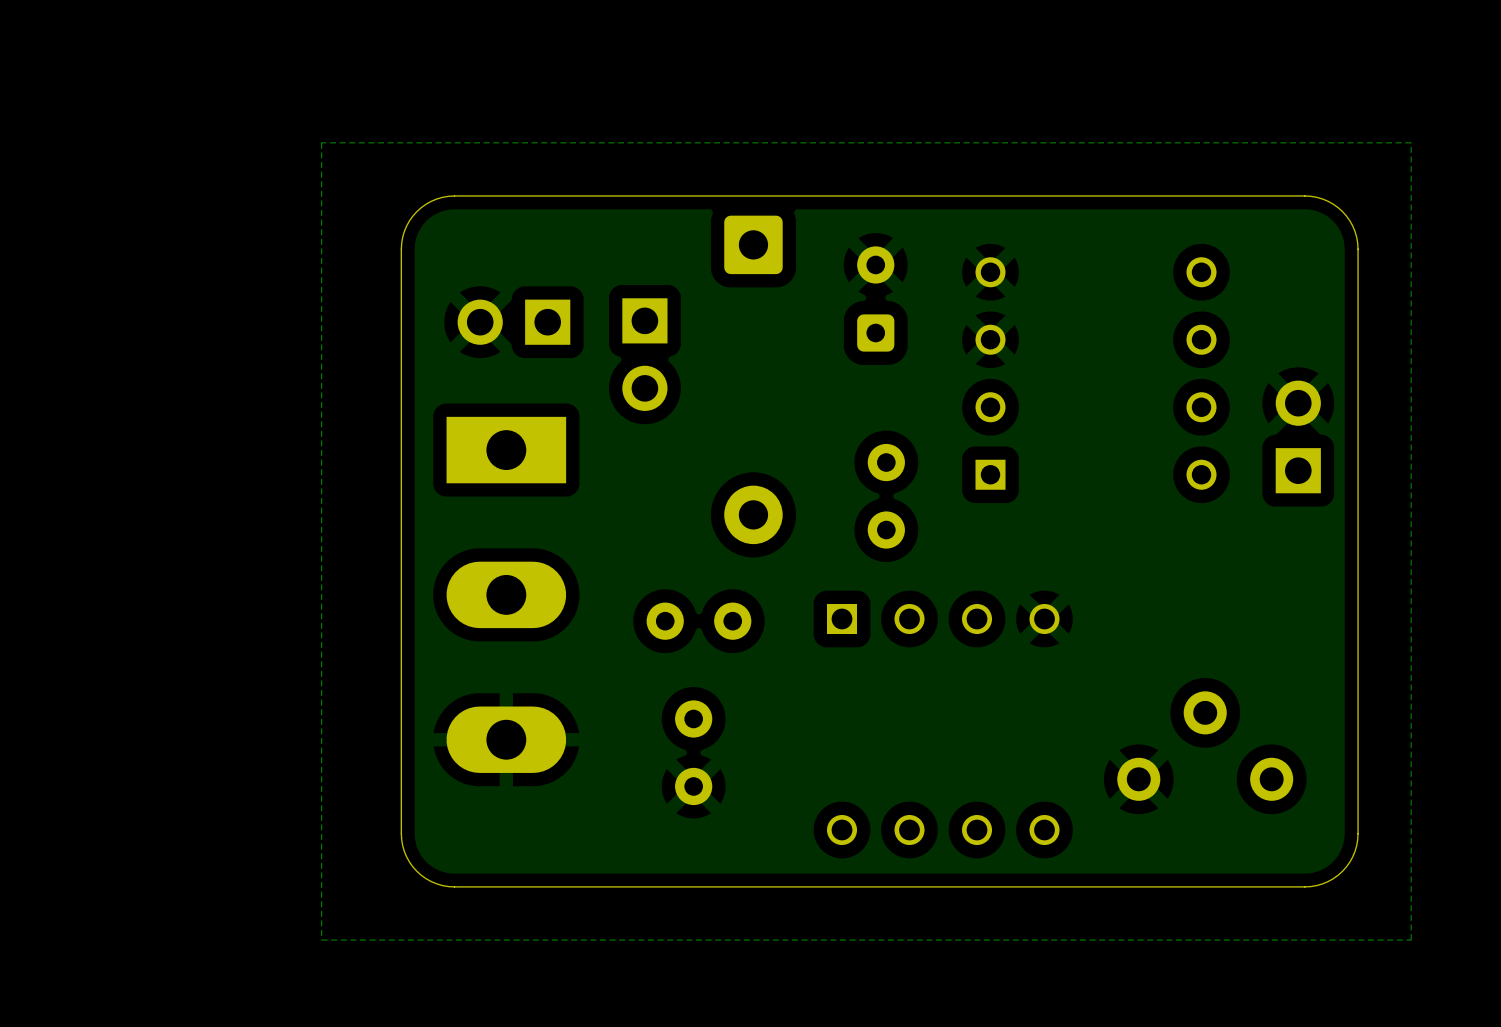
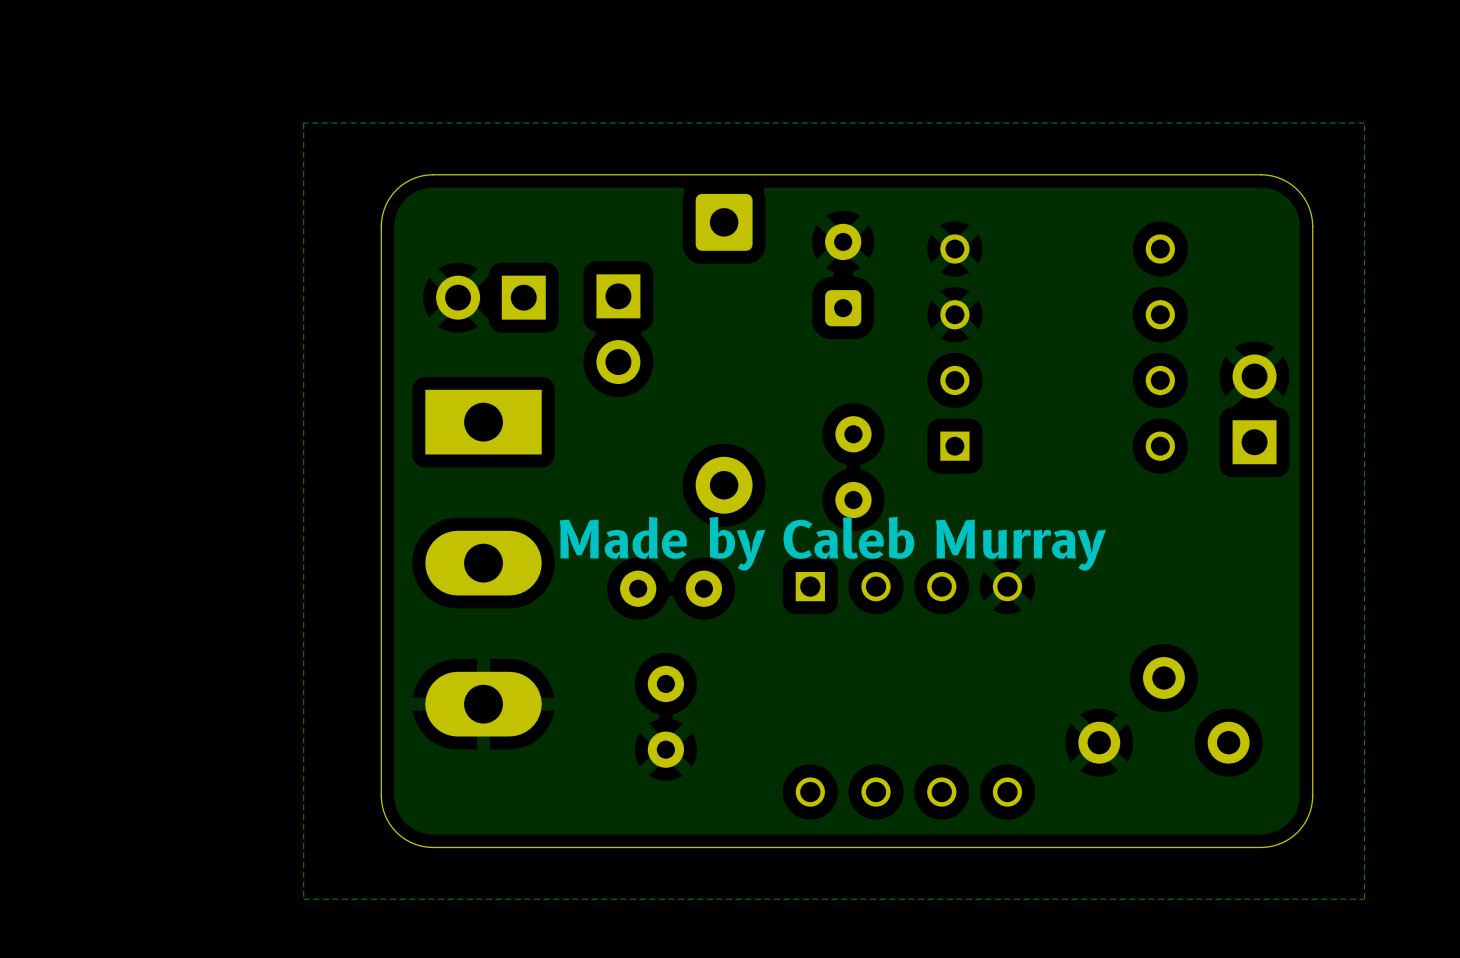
text: none -> Made by Caleb Murray (832, 543)

